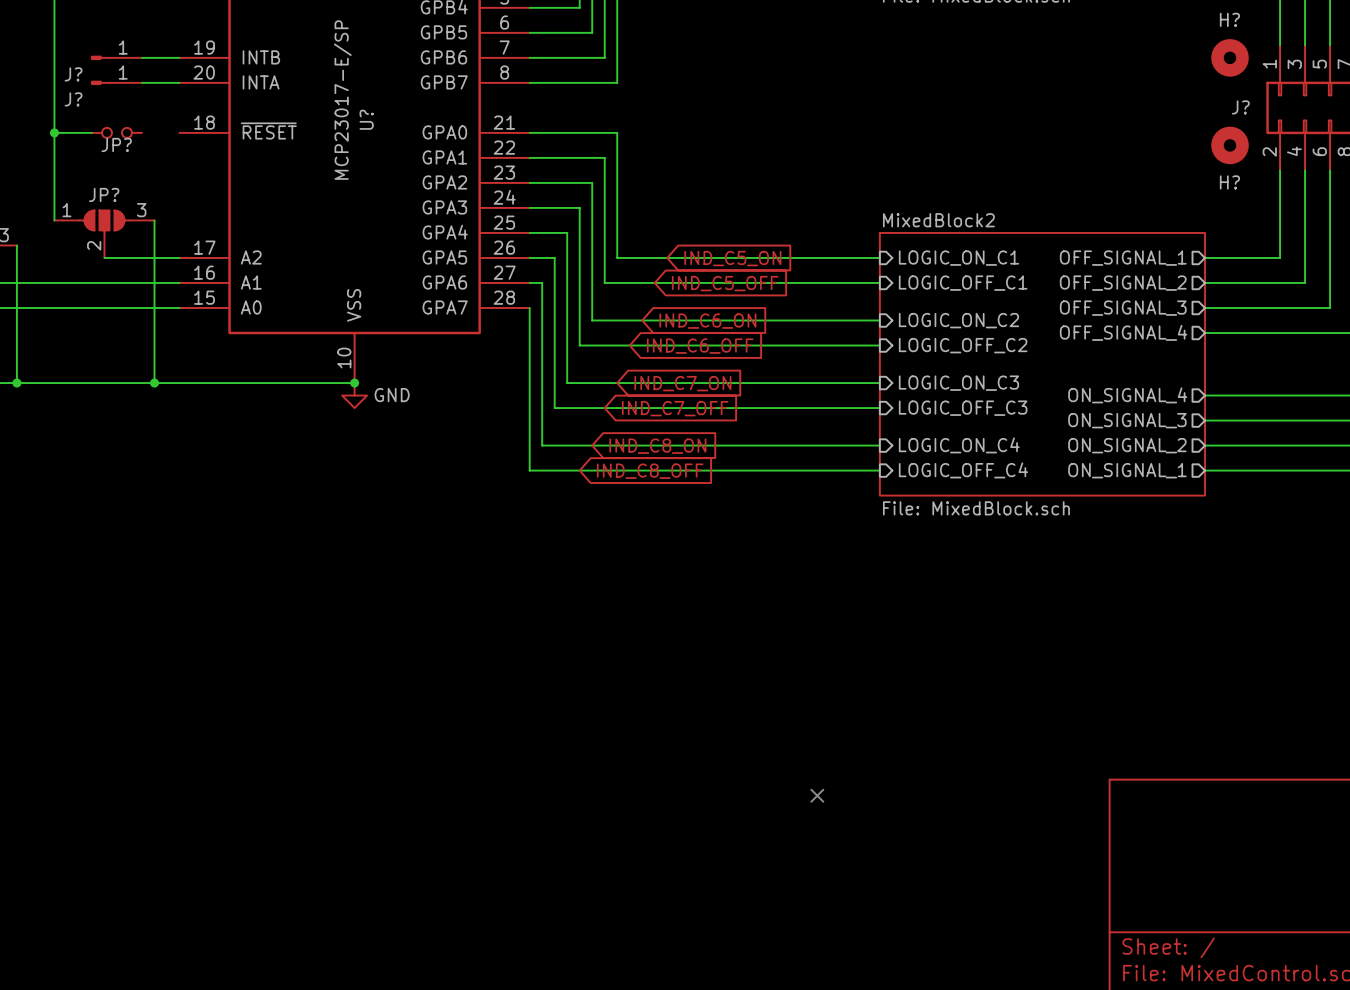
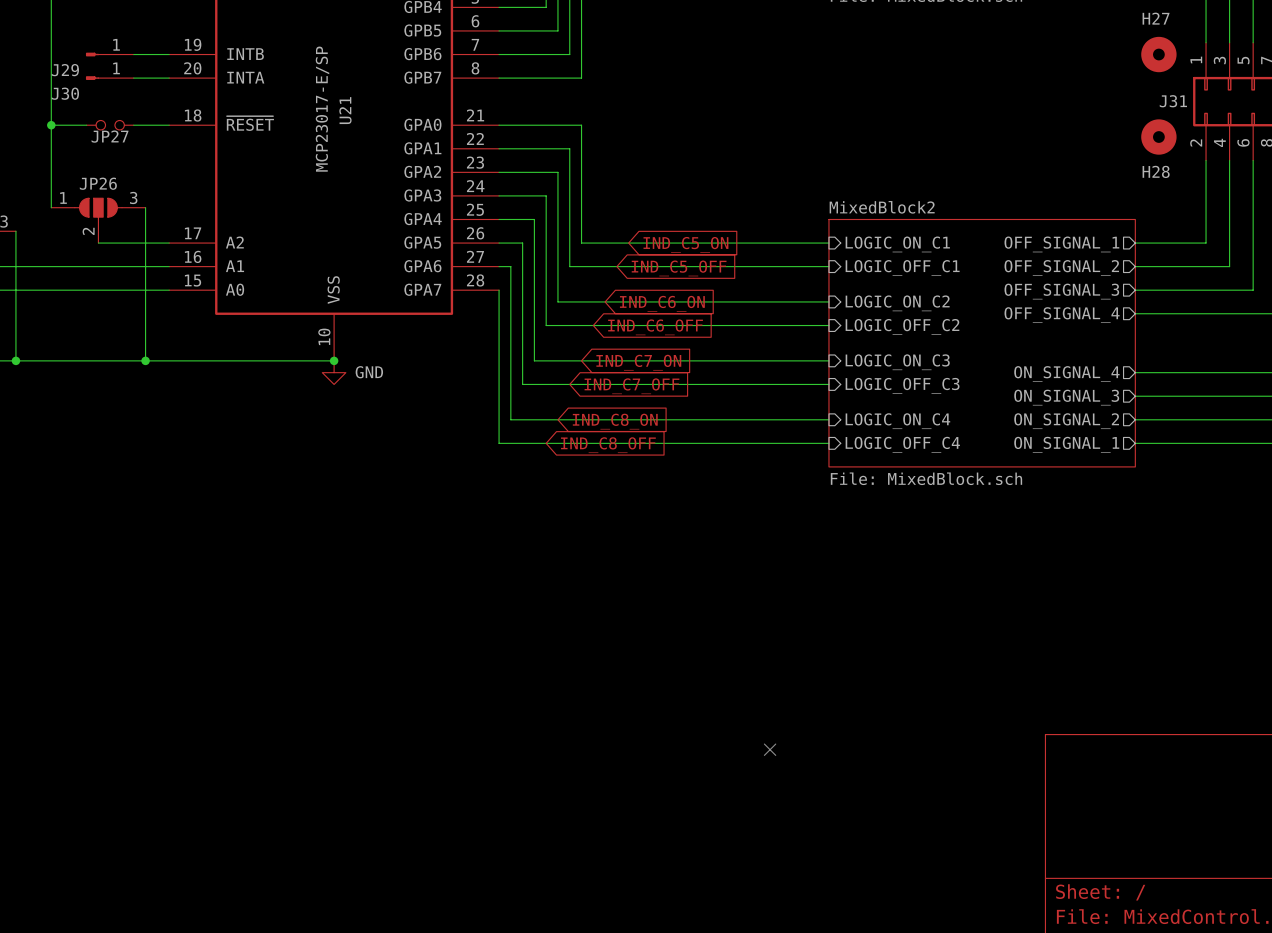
H? name: H? (1229, 19) -> H27 (1156, 18)
J? name: J? (73, 74) -> J29 (65, 70)
J? name: J? (73, 99) -> J30 (65, 93)
J? name: J? (1240, 107) -> J31 (1173, 101)
U? name: U? (366, 119) -> U21 (345, 110)
wire: none -> (133, 125) (169, 125)
JP? name: JP? (116, 144) -> JP27 (110, 136)
H? name: H? (1229, 182) -> H28 (1156, 171)
JP? name: JP? (104, 194) -> JP26 (98, 183)

